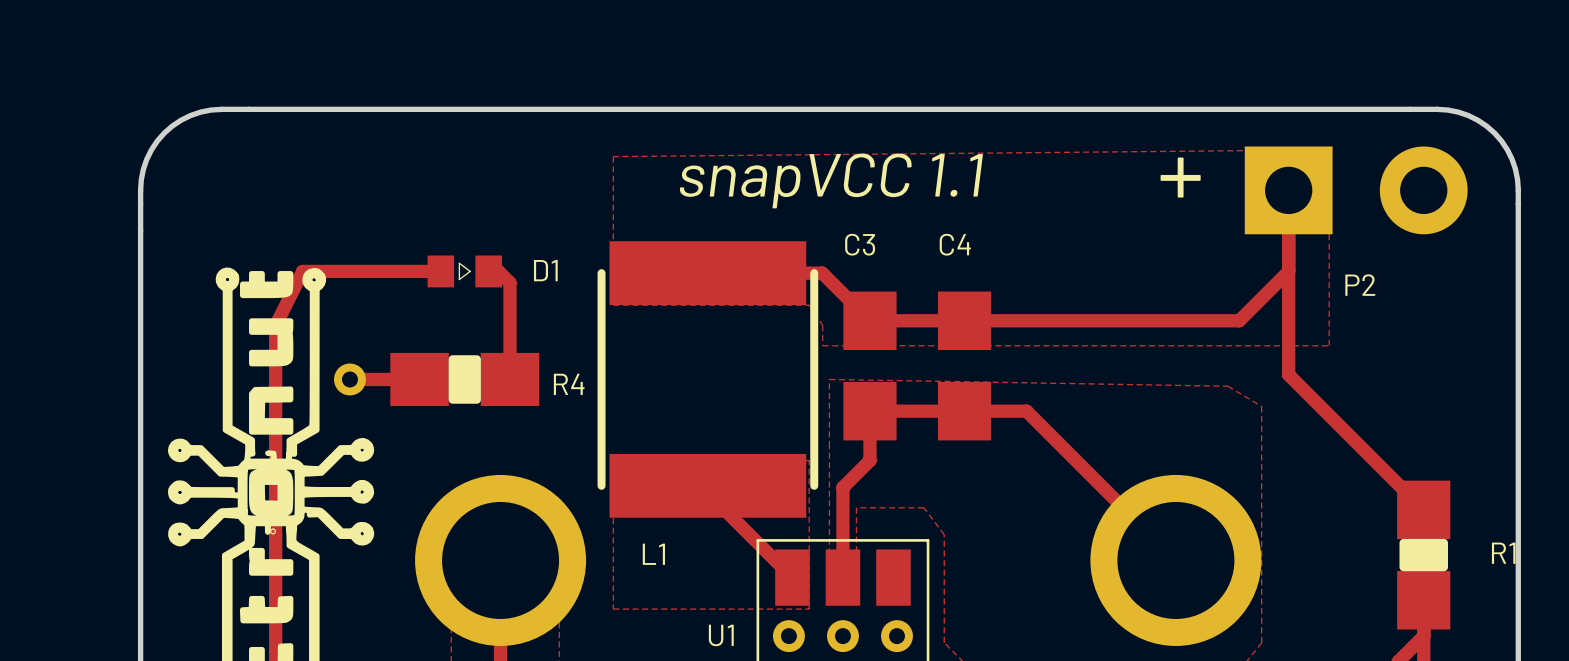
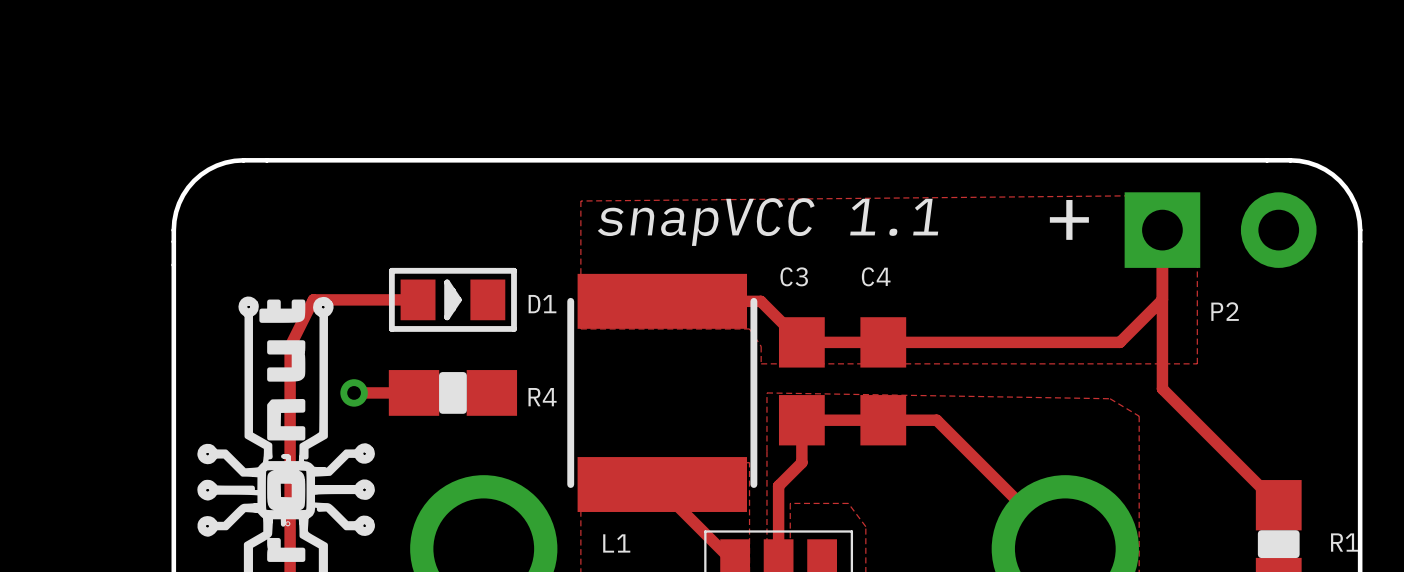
D1 footprint: [427, 255, 502, 288] -> [388, 267, 517, 332]
track: (488, 271) (498, 271) (509, 282) (509, 379) -> none

